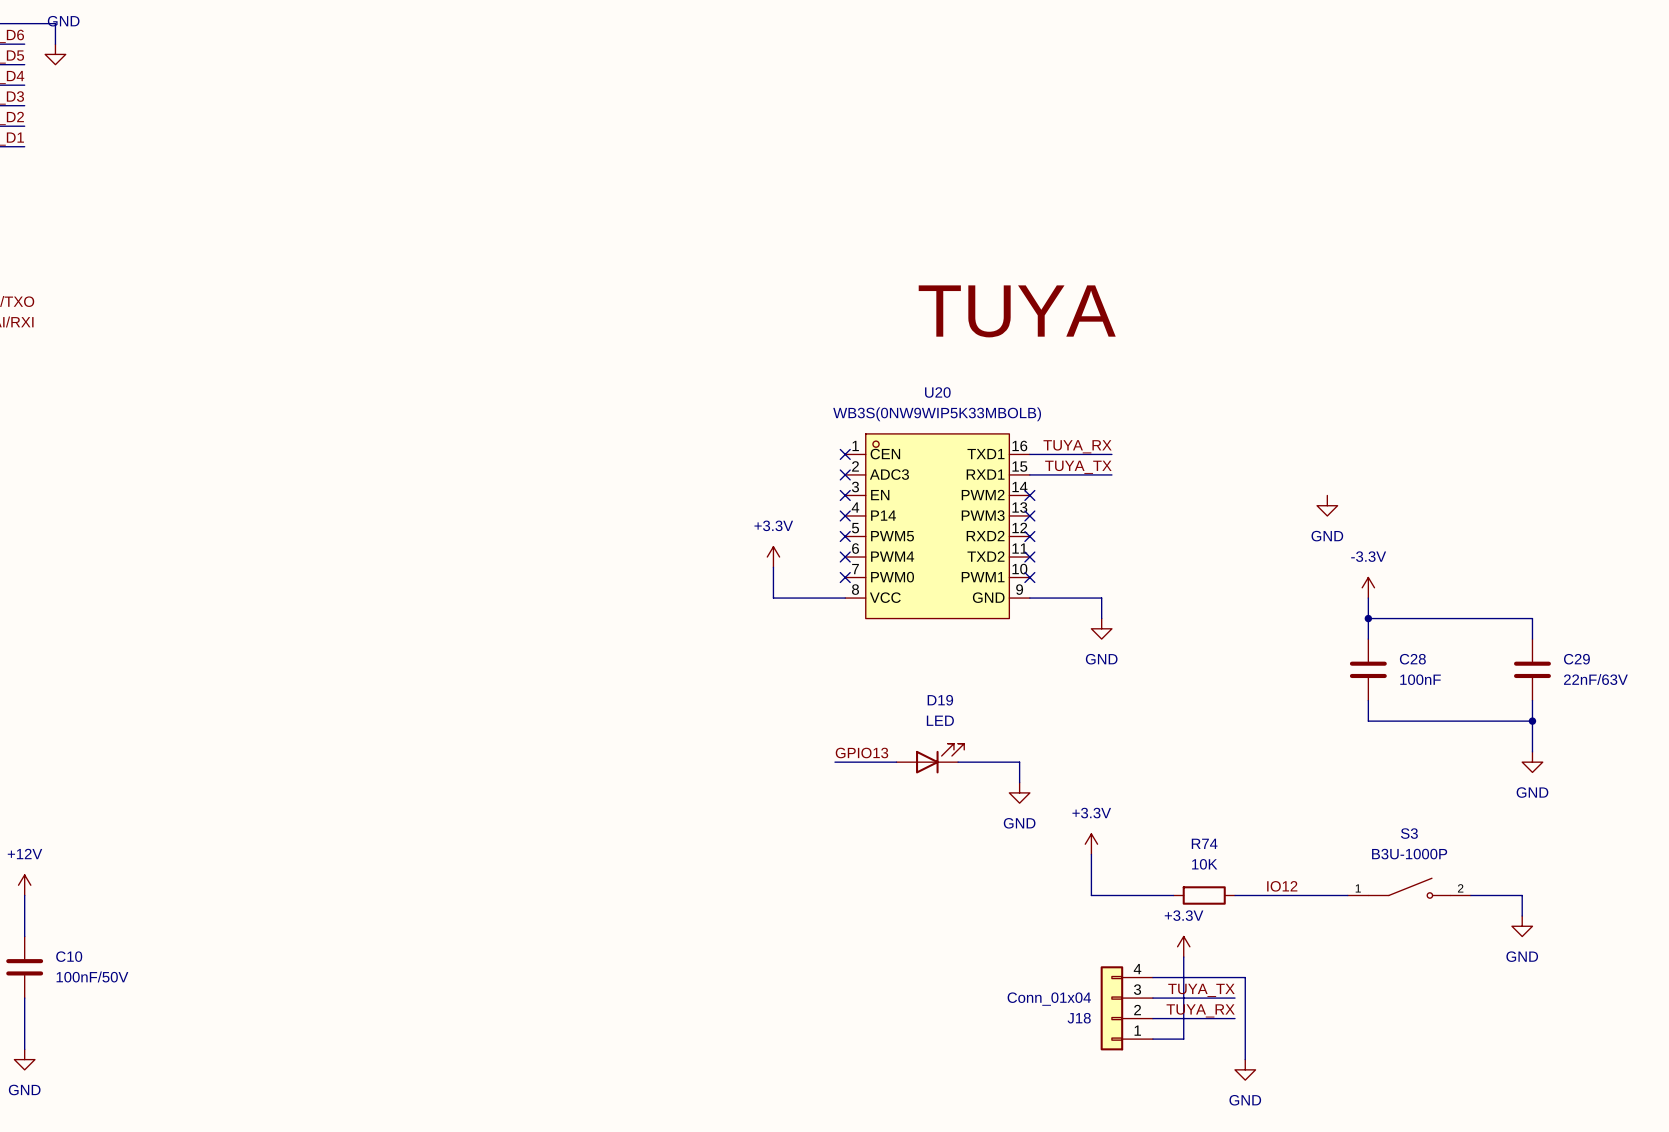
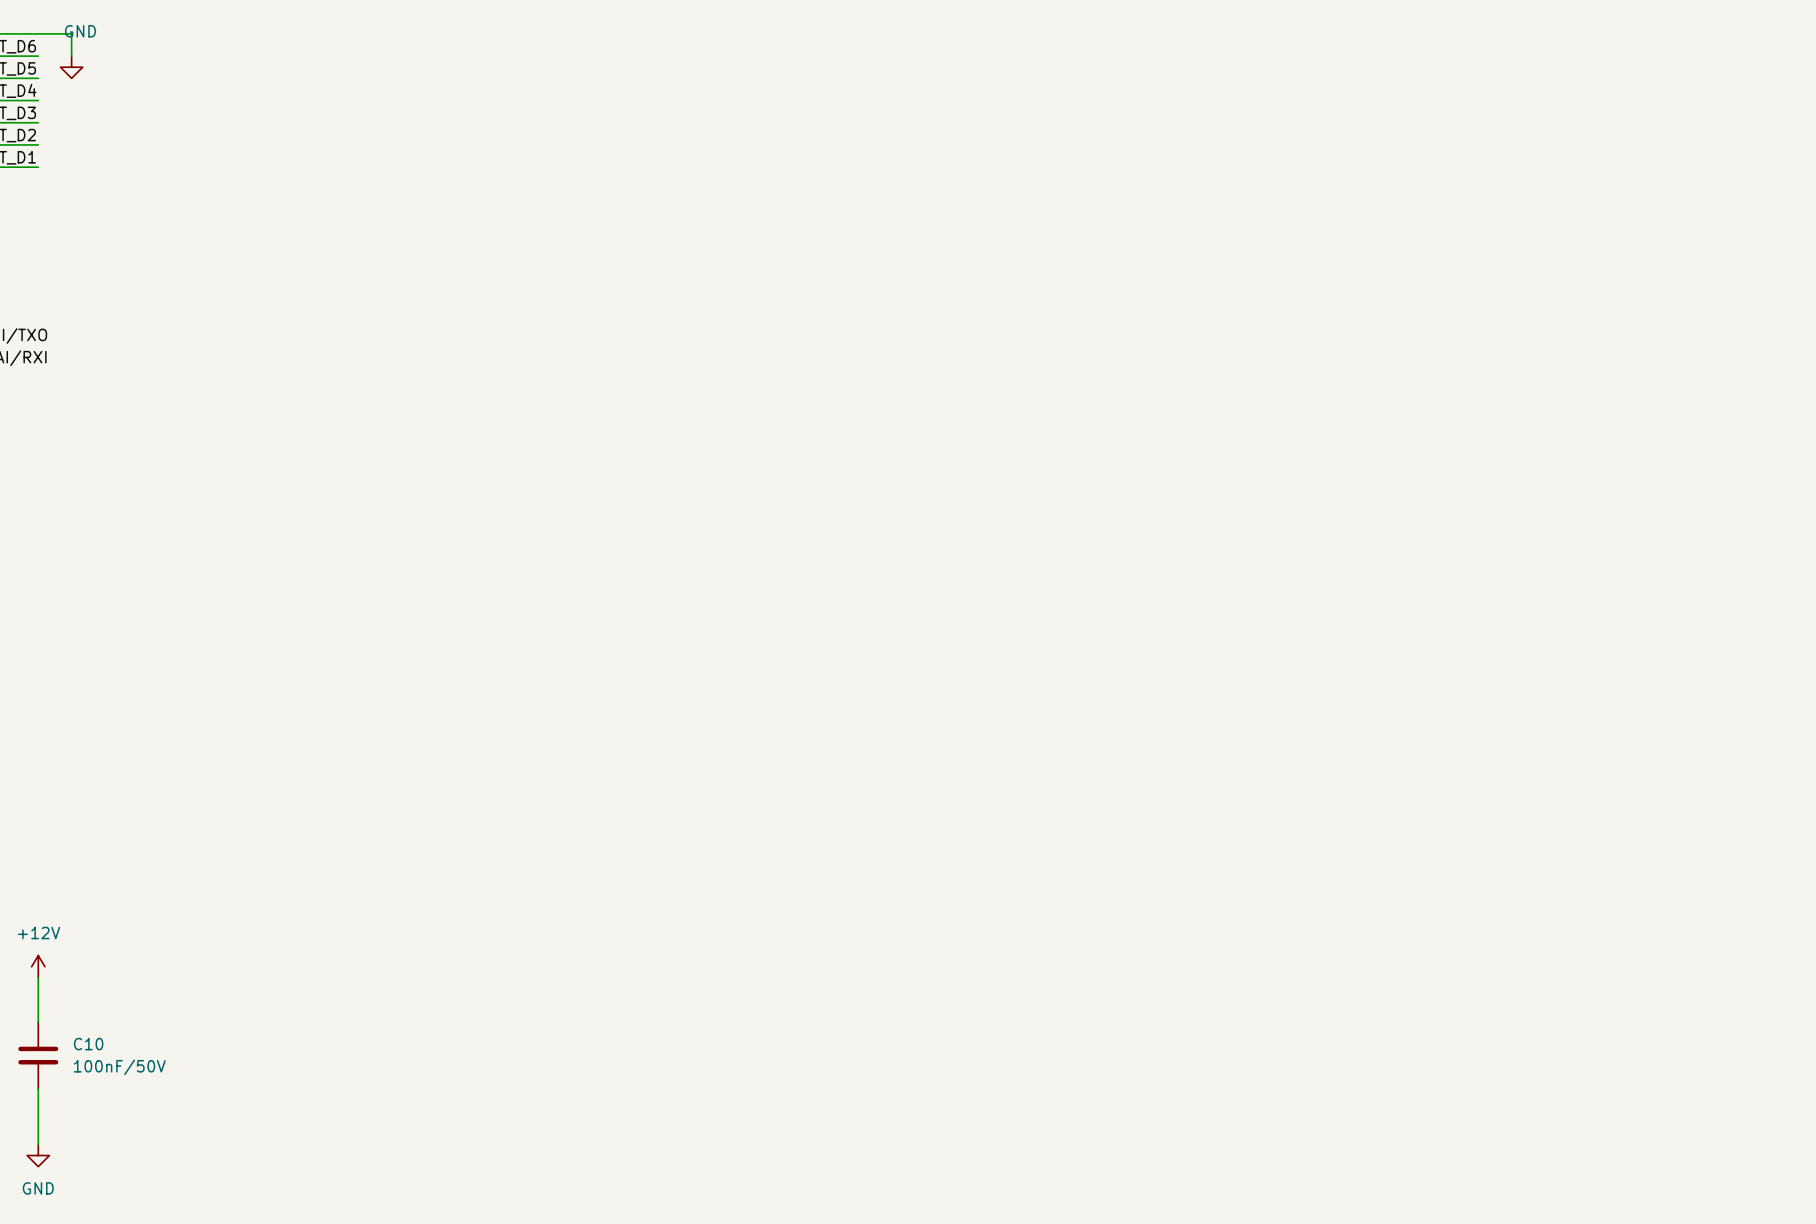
label: TUYA (1017, 311) -> none
label: TUYA_RX (1077, 446) -> none
no-connect mark: (845, 454) -> none
wire: (1029, 454) (1111, 454) -> none
label: TUYA_TX (1078, 467) -> none
no-connect mark: (845, 474) -> none
wire: (1029, 474) (1111, 474) -> none
no-connect mark: (845, 495) -> none
no-connect mark: (1029, 495) -> none
power symbol: GND (1327, 505) -> none
no-connect mark: (845, 515) -> none
no-connect mark: (1029, 515) -> none
U20: WB3S(0NW9WIP5K33MBOLB) (937, 526) -> none
no-connect mark: (845, 536) -> none
no-connect mark: (1029, 536) -> none
power symbol: +3.3V (773, 557) -> none
no-connect mark: (845, 557) -> none
no-connect mark: (1029, 557) -> none
wire: (773, 567) (773, 598) (845, 598) -> none
no-connect mark: (845, 577) -> none
no-connect mark: (1029, 577) -> none
power symbol: -3.3V (1368, 587) -> none
wire: (1029, 598) (1101, 598) (1101, 618) -> none
wire: (1368, 598) (1368, 639) -> none
wire: (1368, 618) (1532, 618) (1532, 639) -> none
junction: (1368, 618) -> none
power symbol: GND (1101, 628) -> none
C28: 100nF (1368, 669) -> none
C29: 22nF/63V (1532, 669) -> none
wire: (1368, 700) (1368, 721) (1532, 721) -> none
wire: (1532, 700) (1532, 751) -> none
junction: (1532, 721) -> none
label: GPIO13 (861, 752) -> none
D19: LED (930, 758) -> none
wire: (834, 762) (896, 762) -> none
wire: (958, 762) (1019, 762) (1019, 782) -> none
power symbol: GND (1532, 762) -> none
power symbol: GND (1019, 792) -> none
power symbol: +3.3V (1091, 844) -> none
wire: (1091, 854) (1091, 895) (1173, 895) -> none
label: IO12 (1282, 886) -> none
S3: B3U-1000P (1409, 888) -> none
R74: 10K (1204, 895) -> none
wire: (1235, 895) (1347, 895) -> none
wire: (1470, 895) (1522, 895) (1522, 916) -> none
power symbol: GND (1522, 926) -> none
power symbol: +3.3V (1183, 946) -> none
wire: (1183, 957) (1183, 1039) (1152, 1039) -> none
wire: (1152, 977) (1245, 977) (1245, 1059) -> none
label: TUYA_TX (1201, 990) -> none
wire: (1152, 998) (1235, 998) -> none
J18: Conn_01x04 (1126, 1008) -> none
label: TUYA_RX (1200, 1010) -> none
wire: (1152, 1018) (1235, 1018) -> none
power symbol: GND (1245, 1069) -> none

